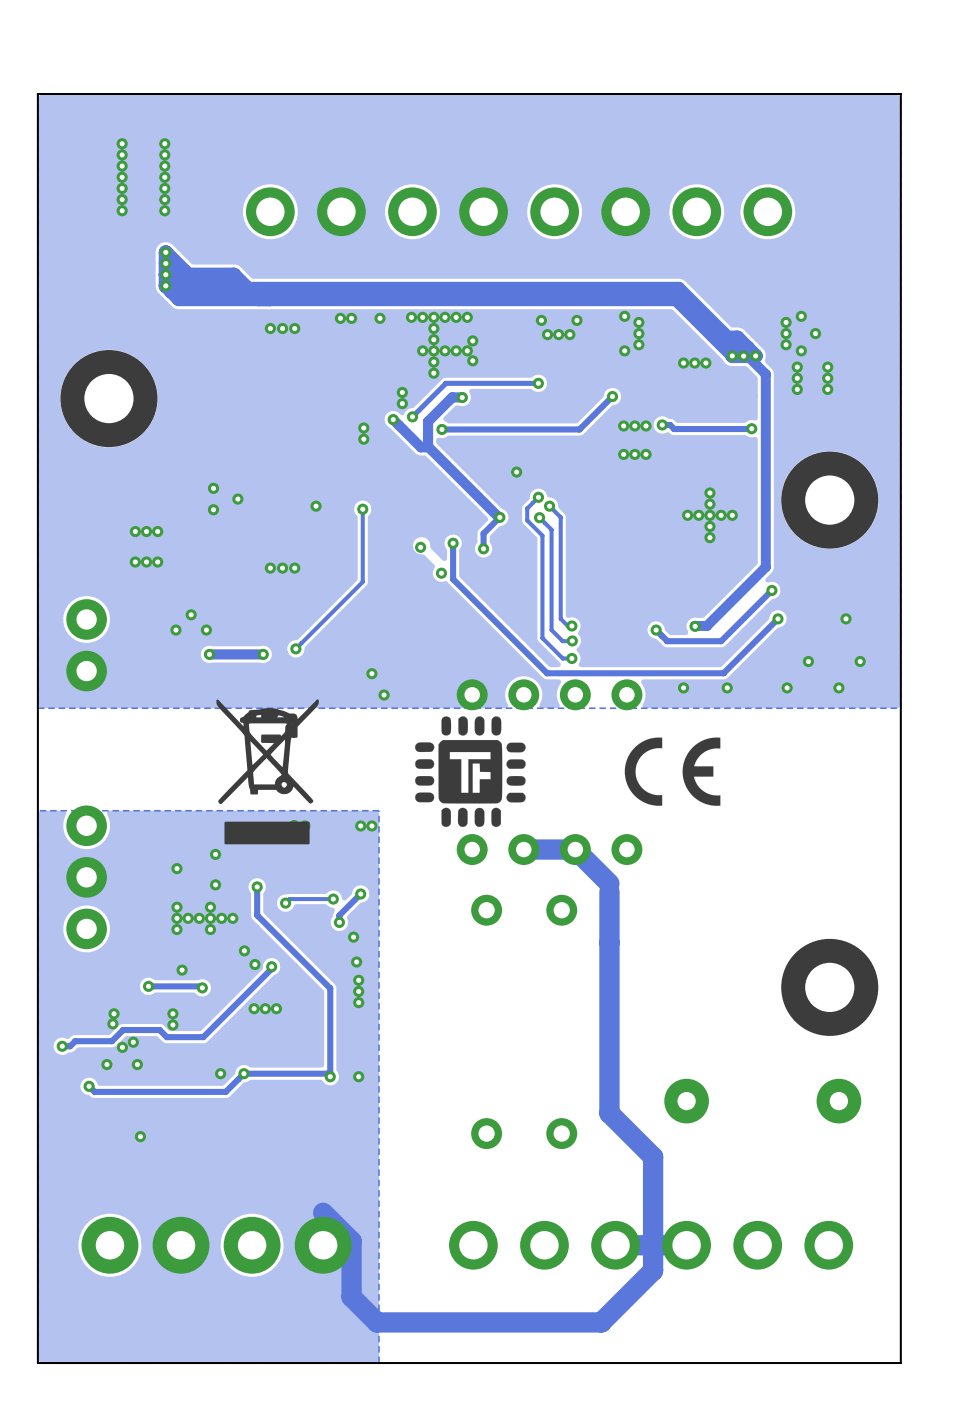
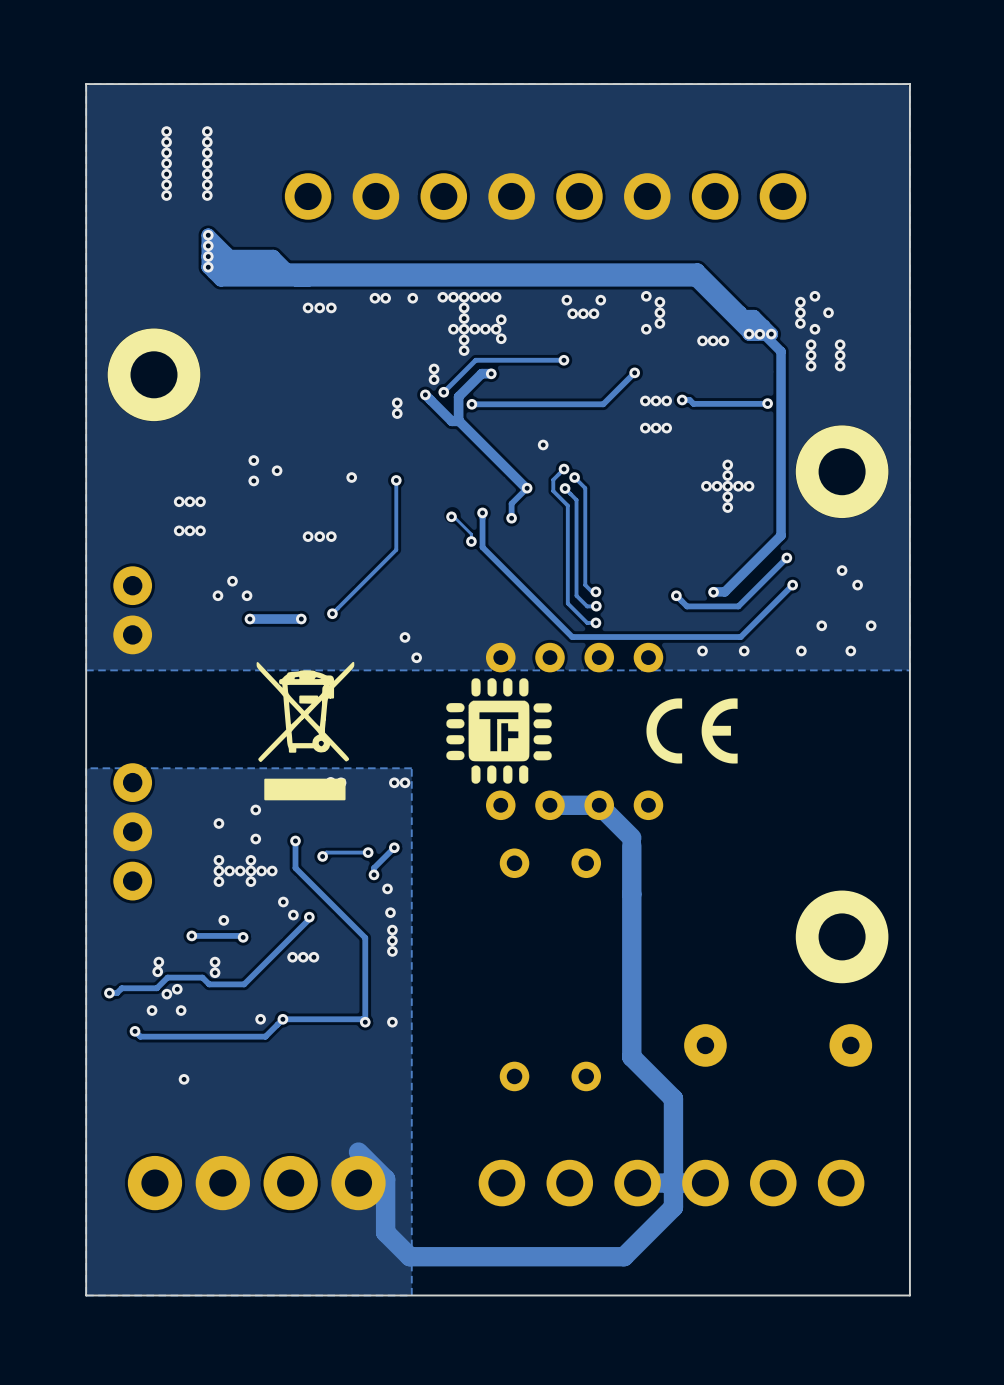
track: none -> (452, 515) (471, 534) (471, 541)
via: none -> (842, 570)

